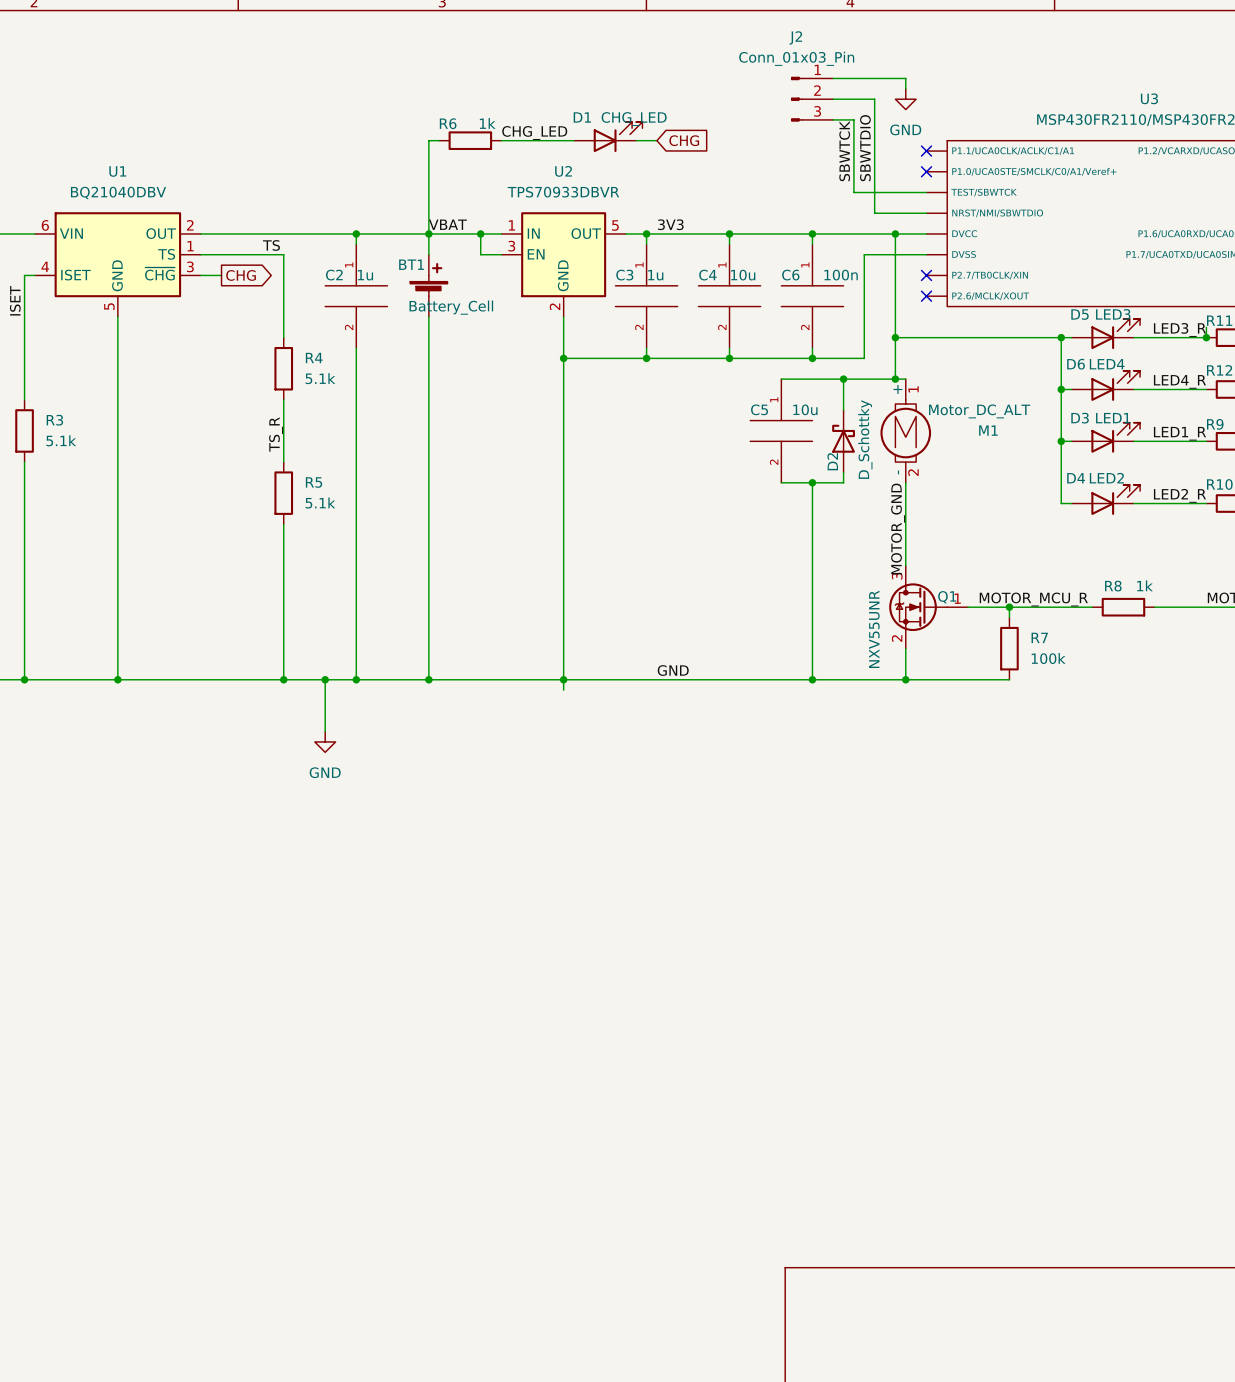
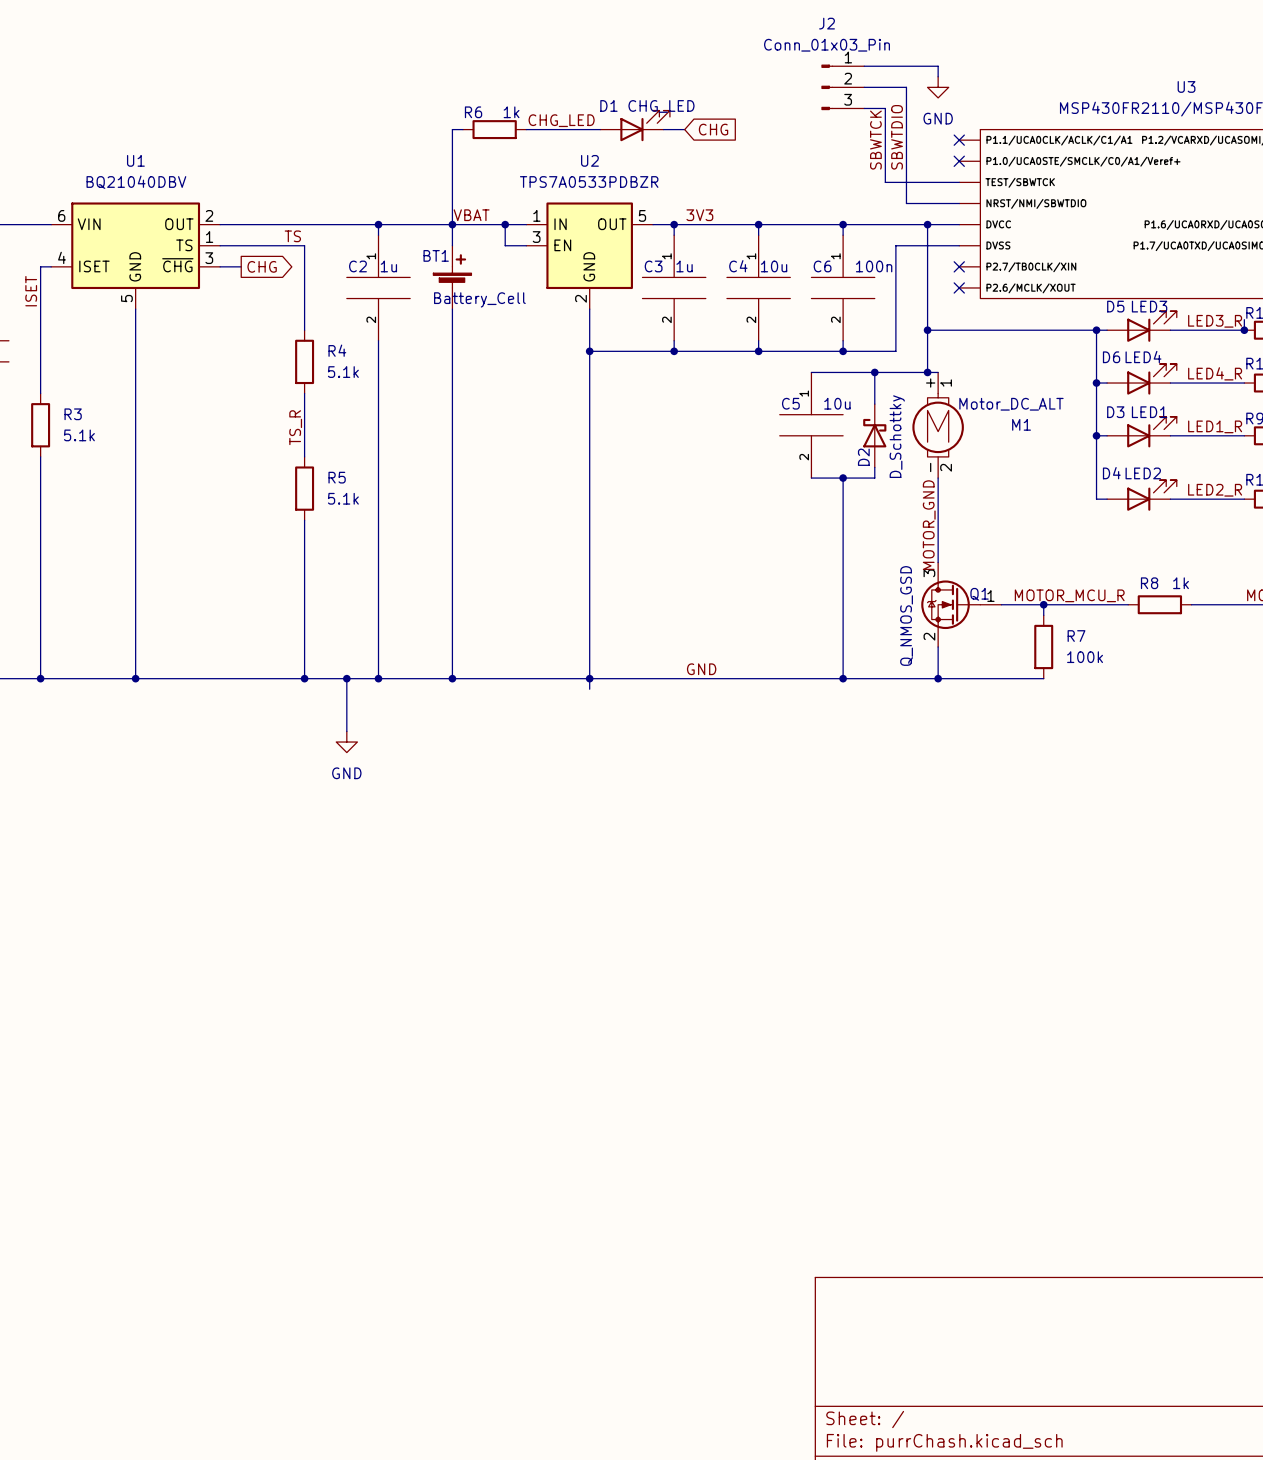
U2 value: TPS70933DBVR (563, 192) -> TPS7A0533PDBZR (589, 181)
Q1 value: NXV55UNR (874, 629) -> Q_NMOS_GSD (906, 615)

